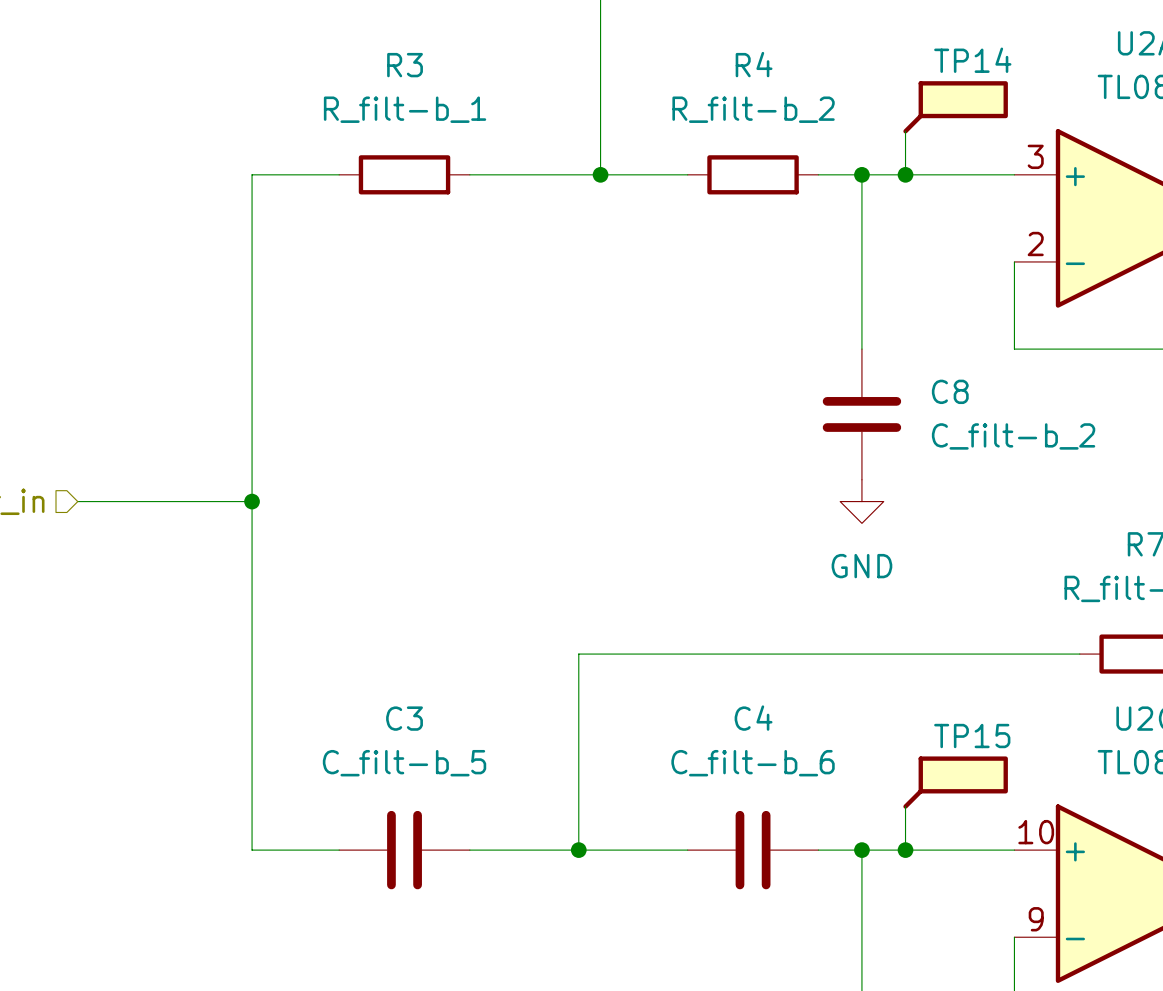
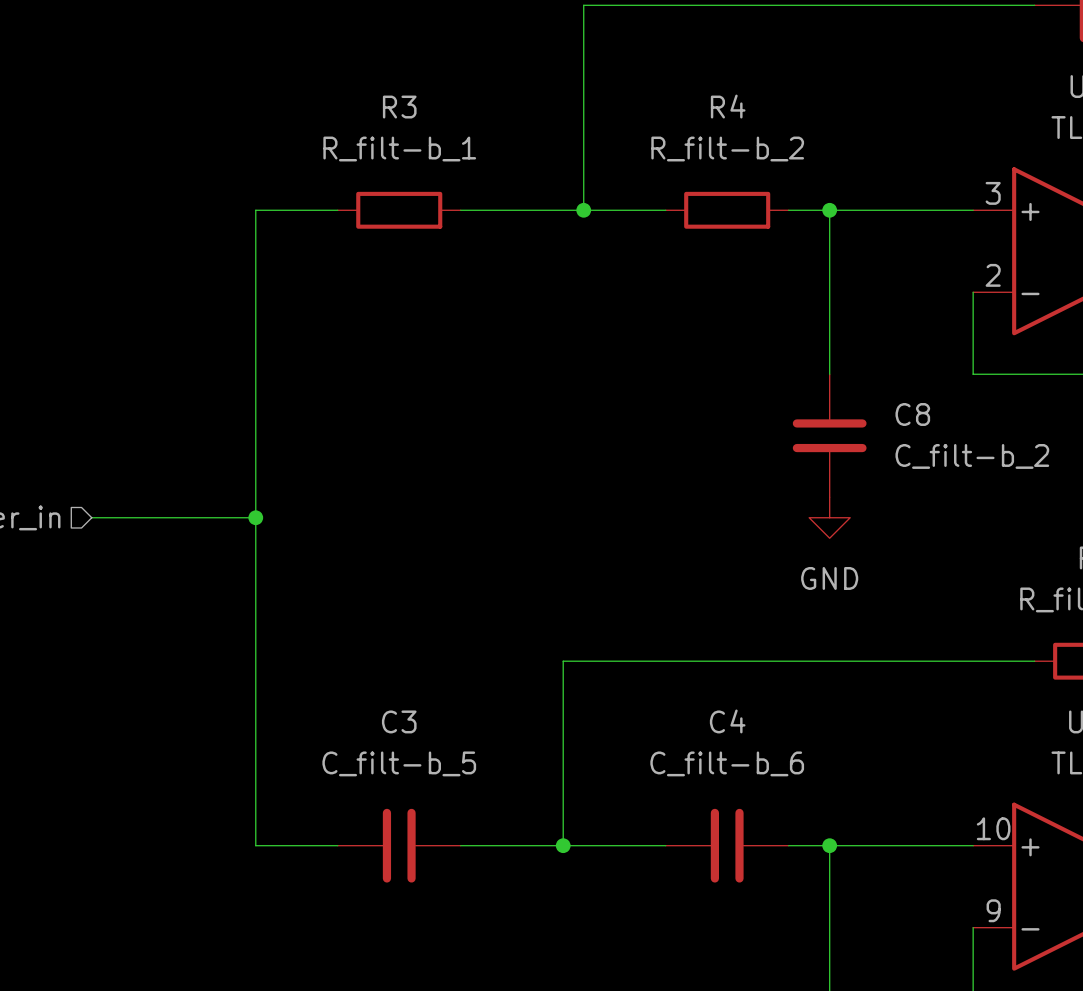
TP14: (955, 107) -> none
wire: (905, 131) (905, 174) -> none
junction: (905, 174) -> none
TP15: (955, 782) -> none
wire: (905, 806) (905, 850) -> none
junction: (905, 850) -> none

